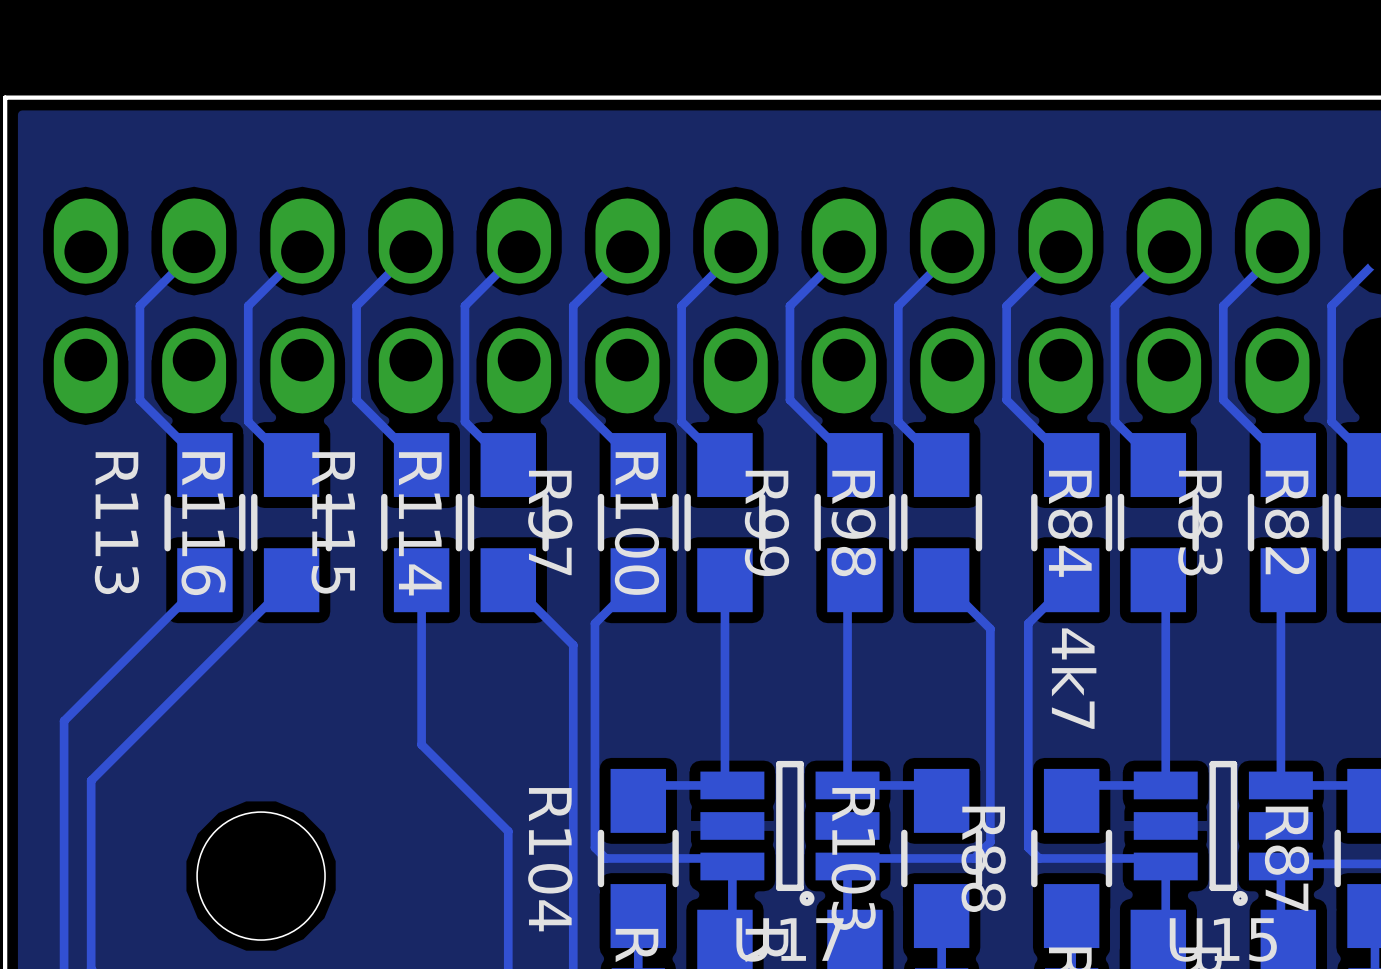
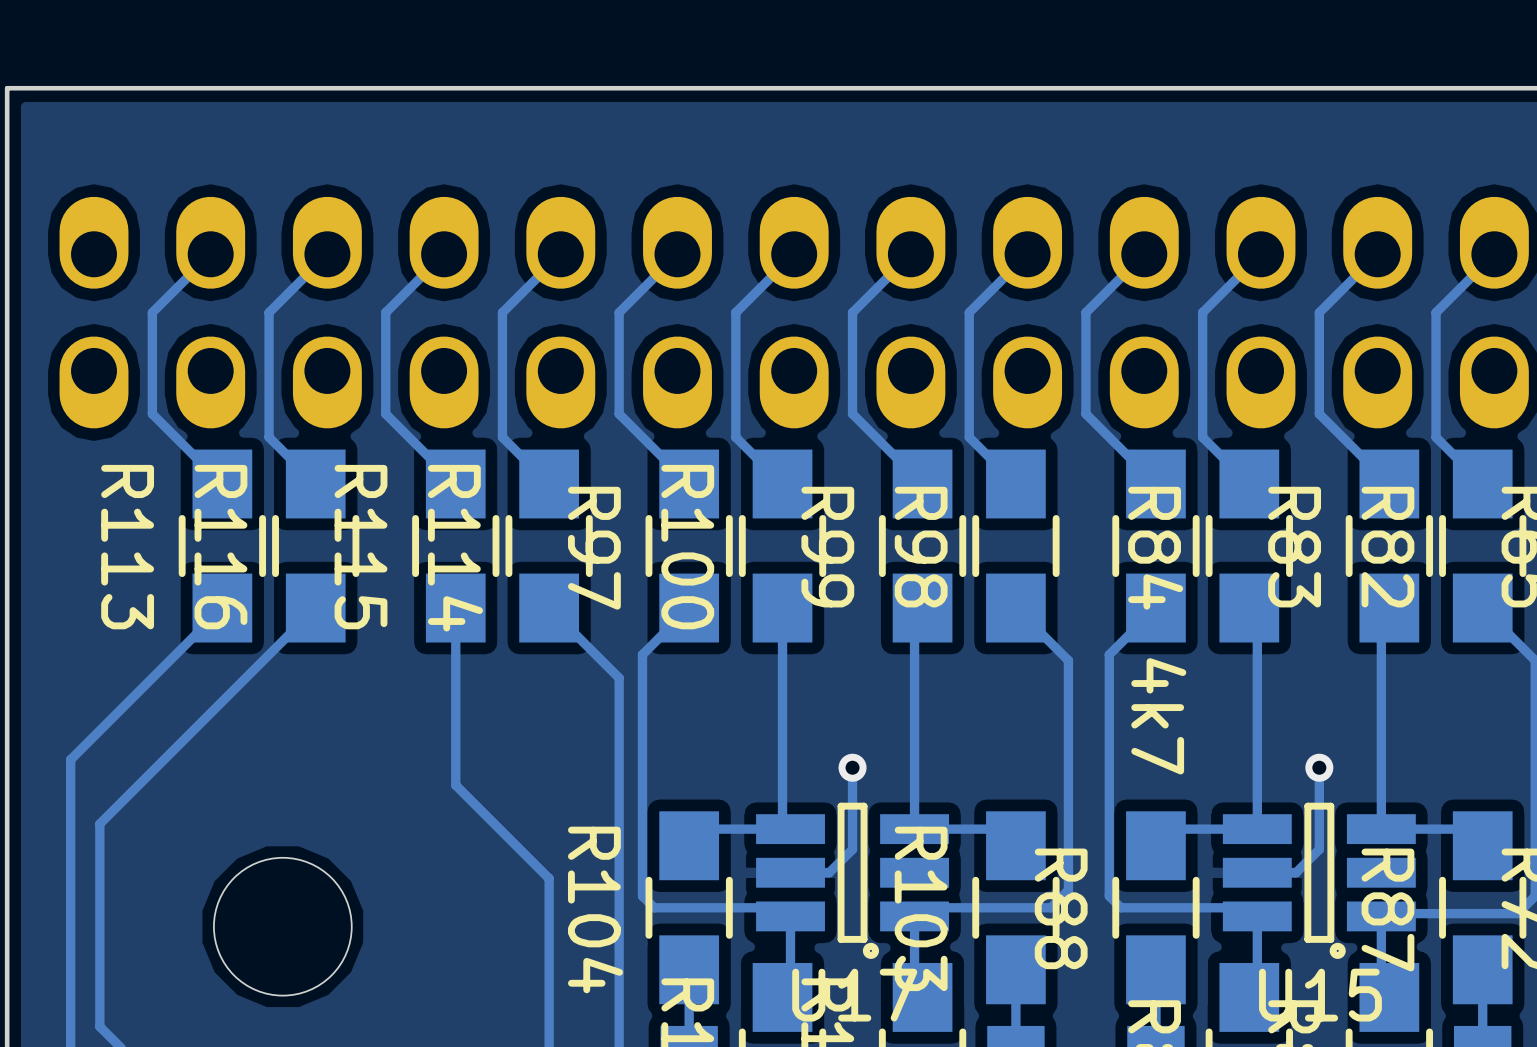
track: none -> (852, 767) (852, 849) (829, 872) (790, 872)
via: none -> (852, 767)
track: none -> (1319, 767) (1319, 849) (1296, 872) (1257, 872)
via: none -> (1319, 767)

